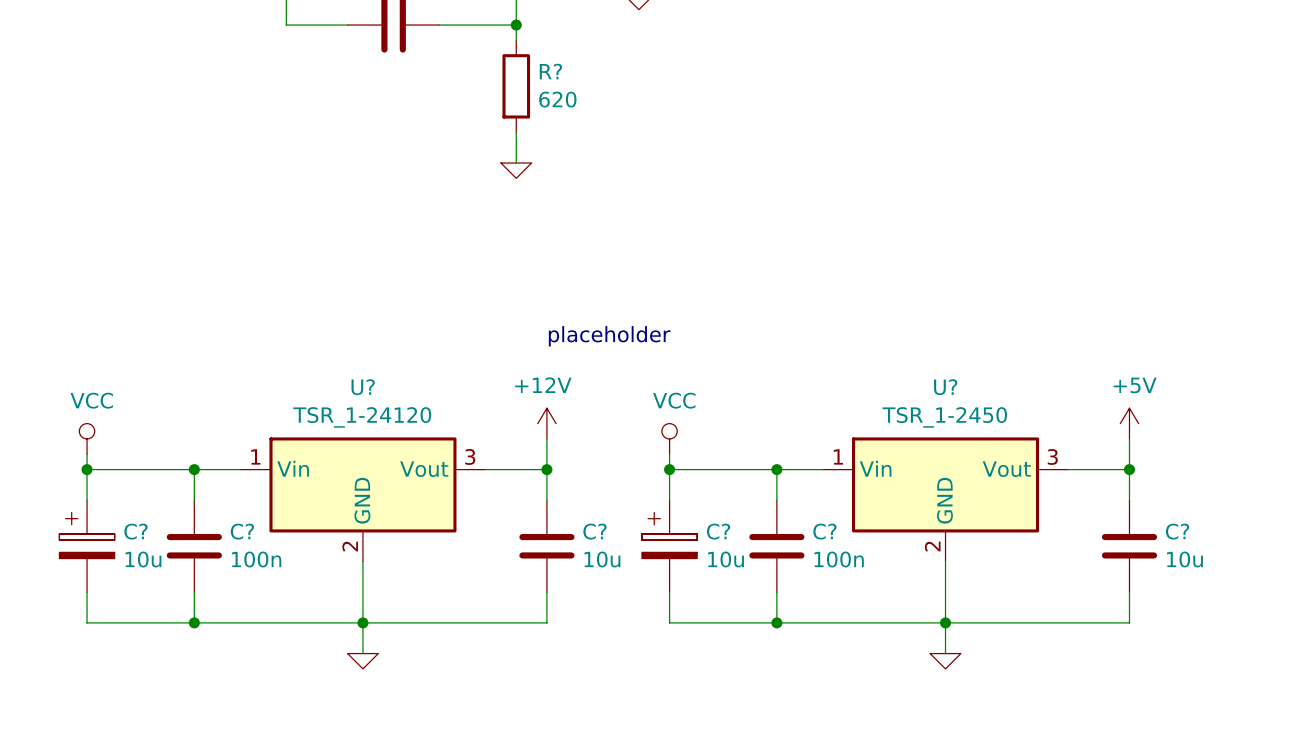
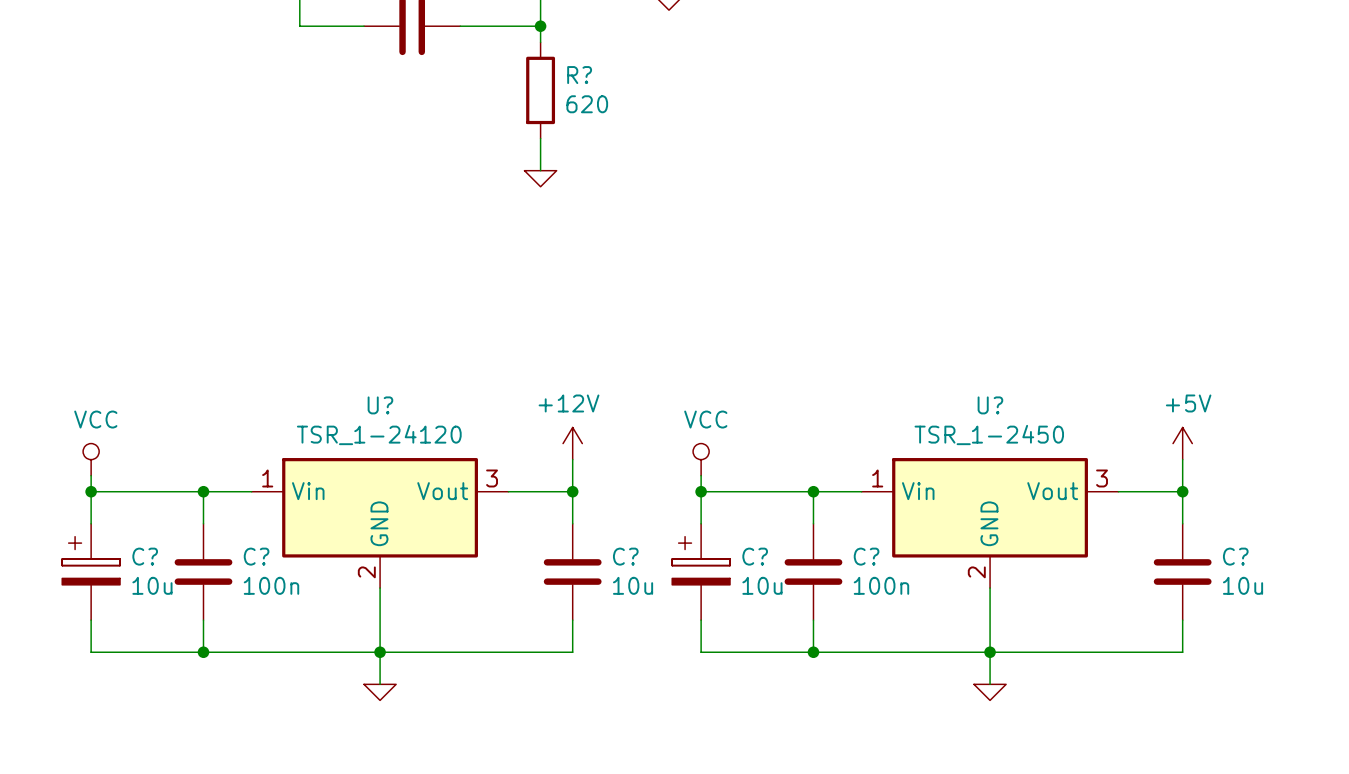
text: placeholder (609, 336) -> none

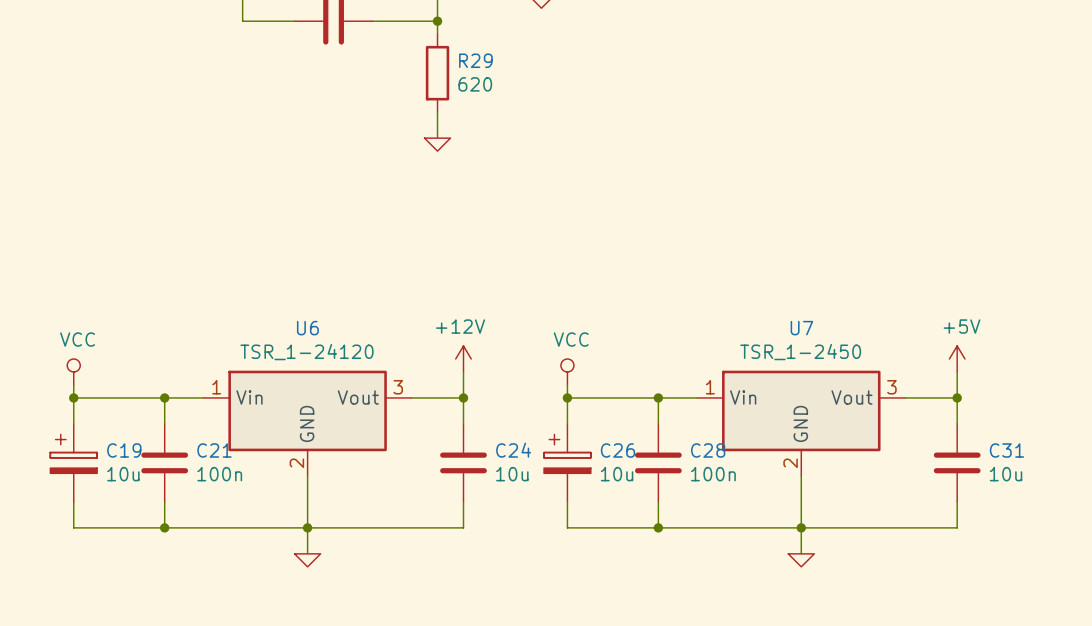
R? name: R? (579, 75) -> R29 (475, 60)
U? name: U? (380, 405) -> U6 (307, 328)
U? name: U? (990, 405) -> U7 (801, 328)
C? name: C? (145, 556) -> C19 (124, 450)
C? name: C? (256, 556) -> C21 (214, 450)
C? name: C? (625, 556) -> C24 (513, 450)
C? name: C? (755, 556) -> C26 (617, 450)
C? name: C? (866, 556) -> C28 (708, 450)
C? name: C? (1235, 556) -> C31 (1006, 450)

